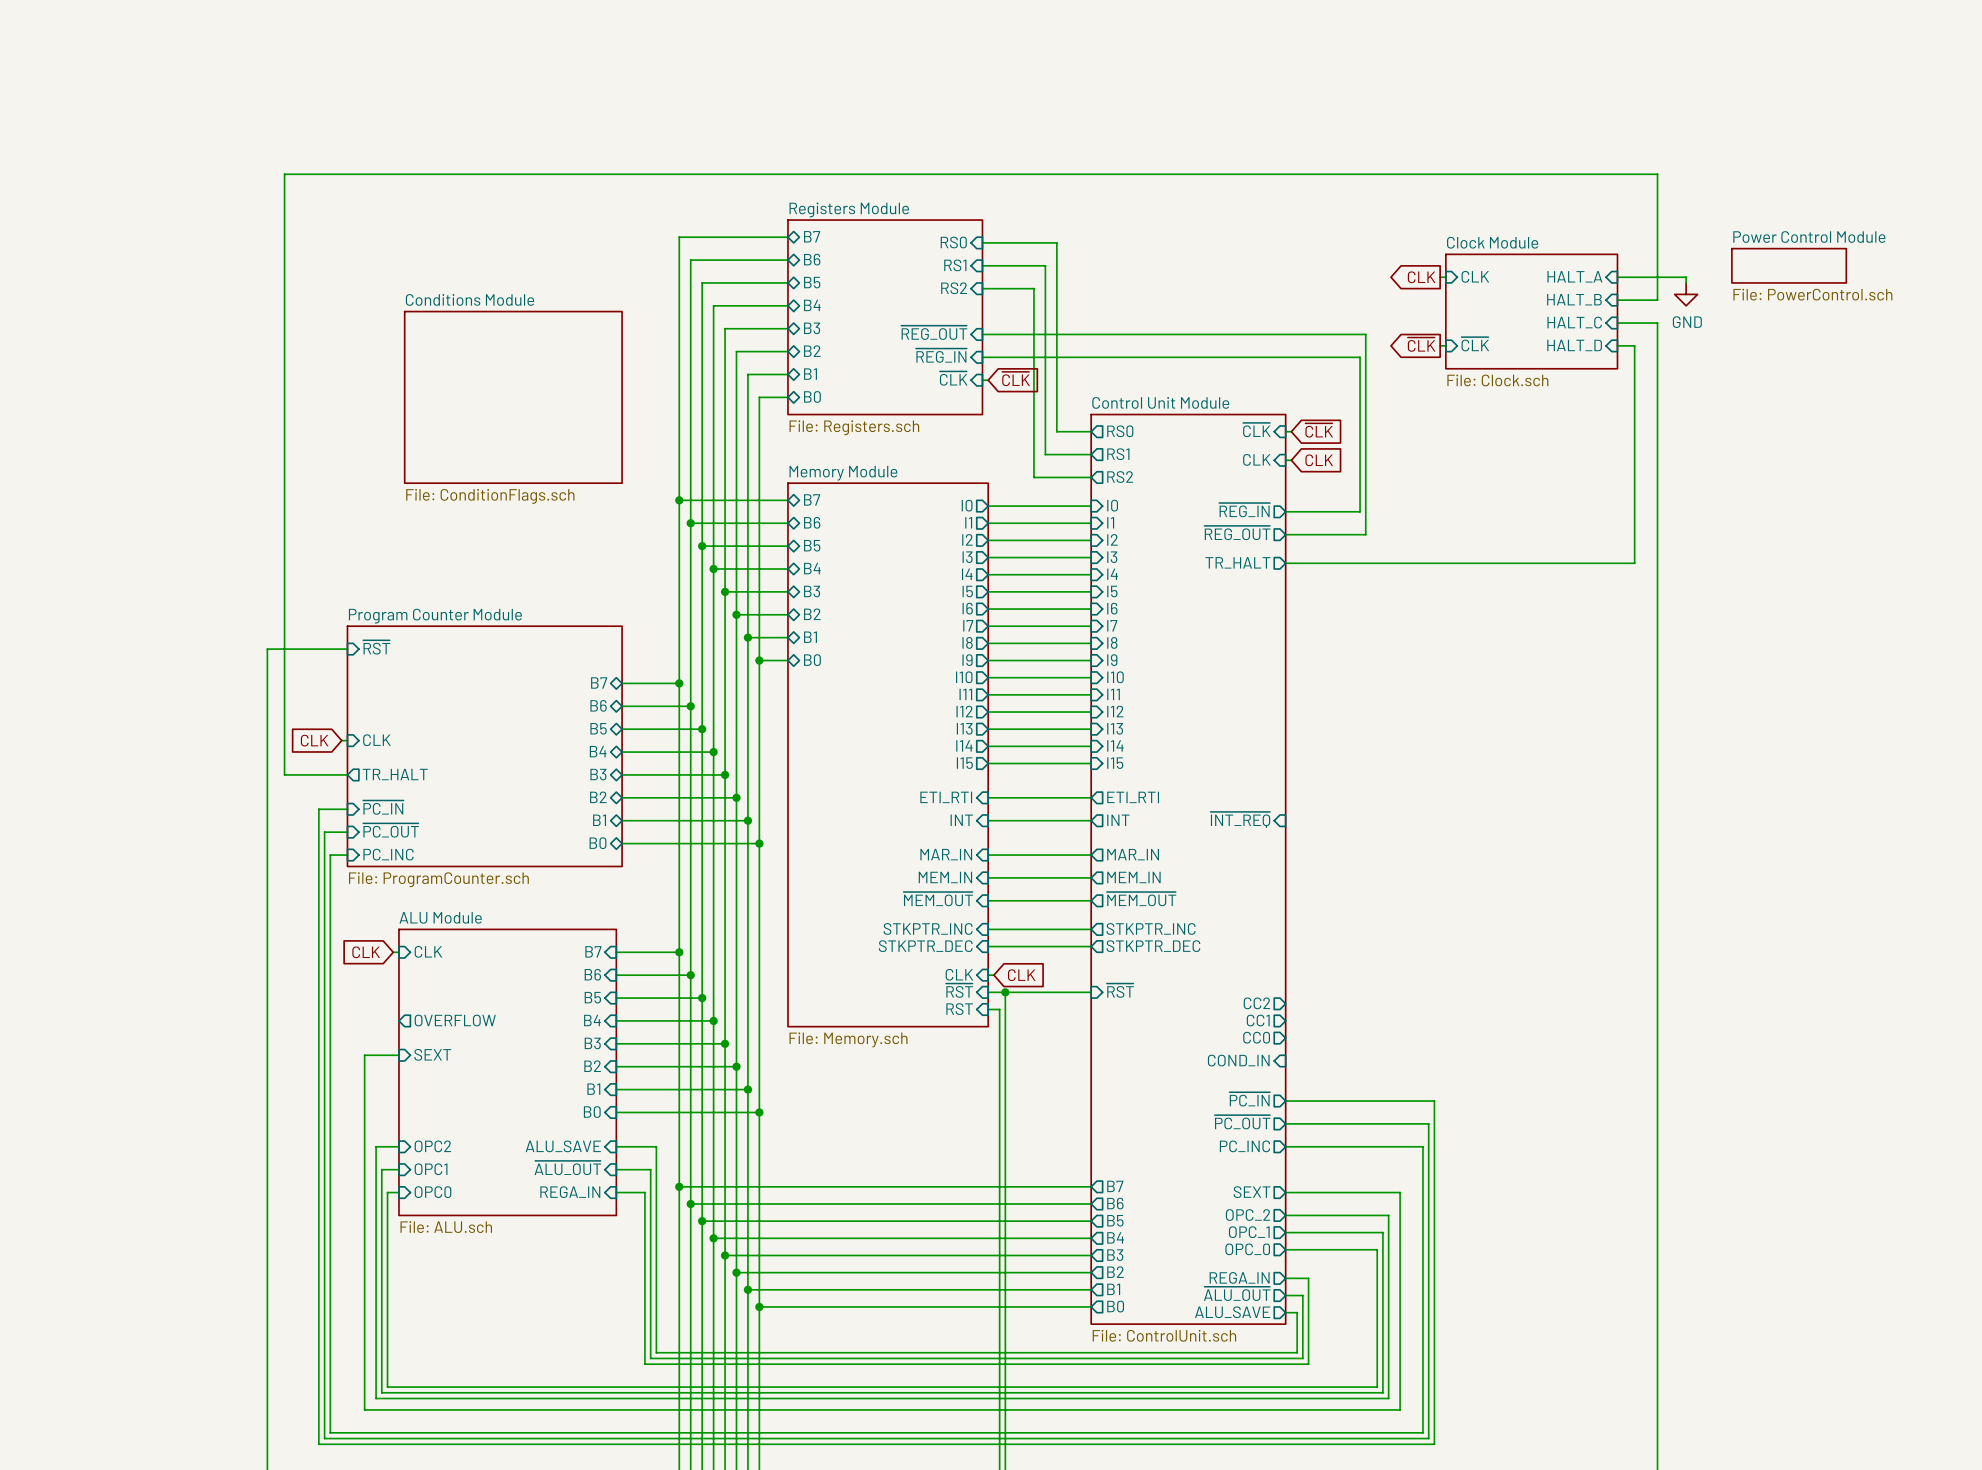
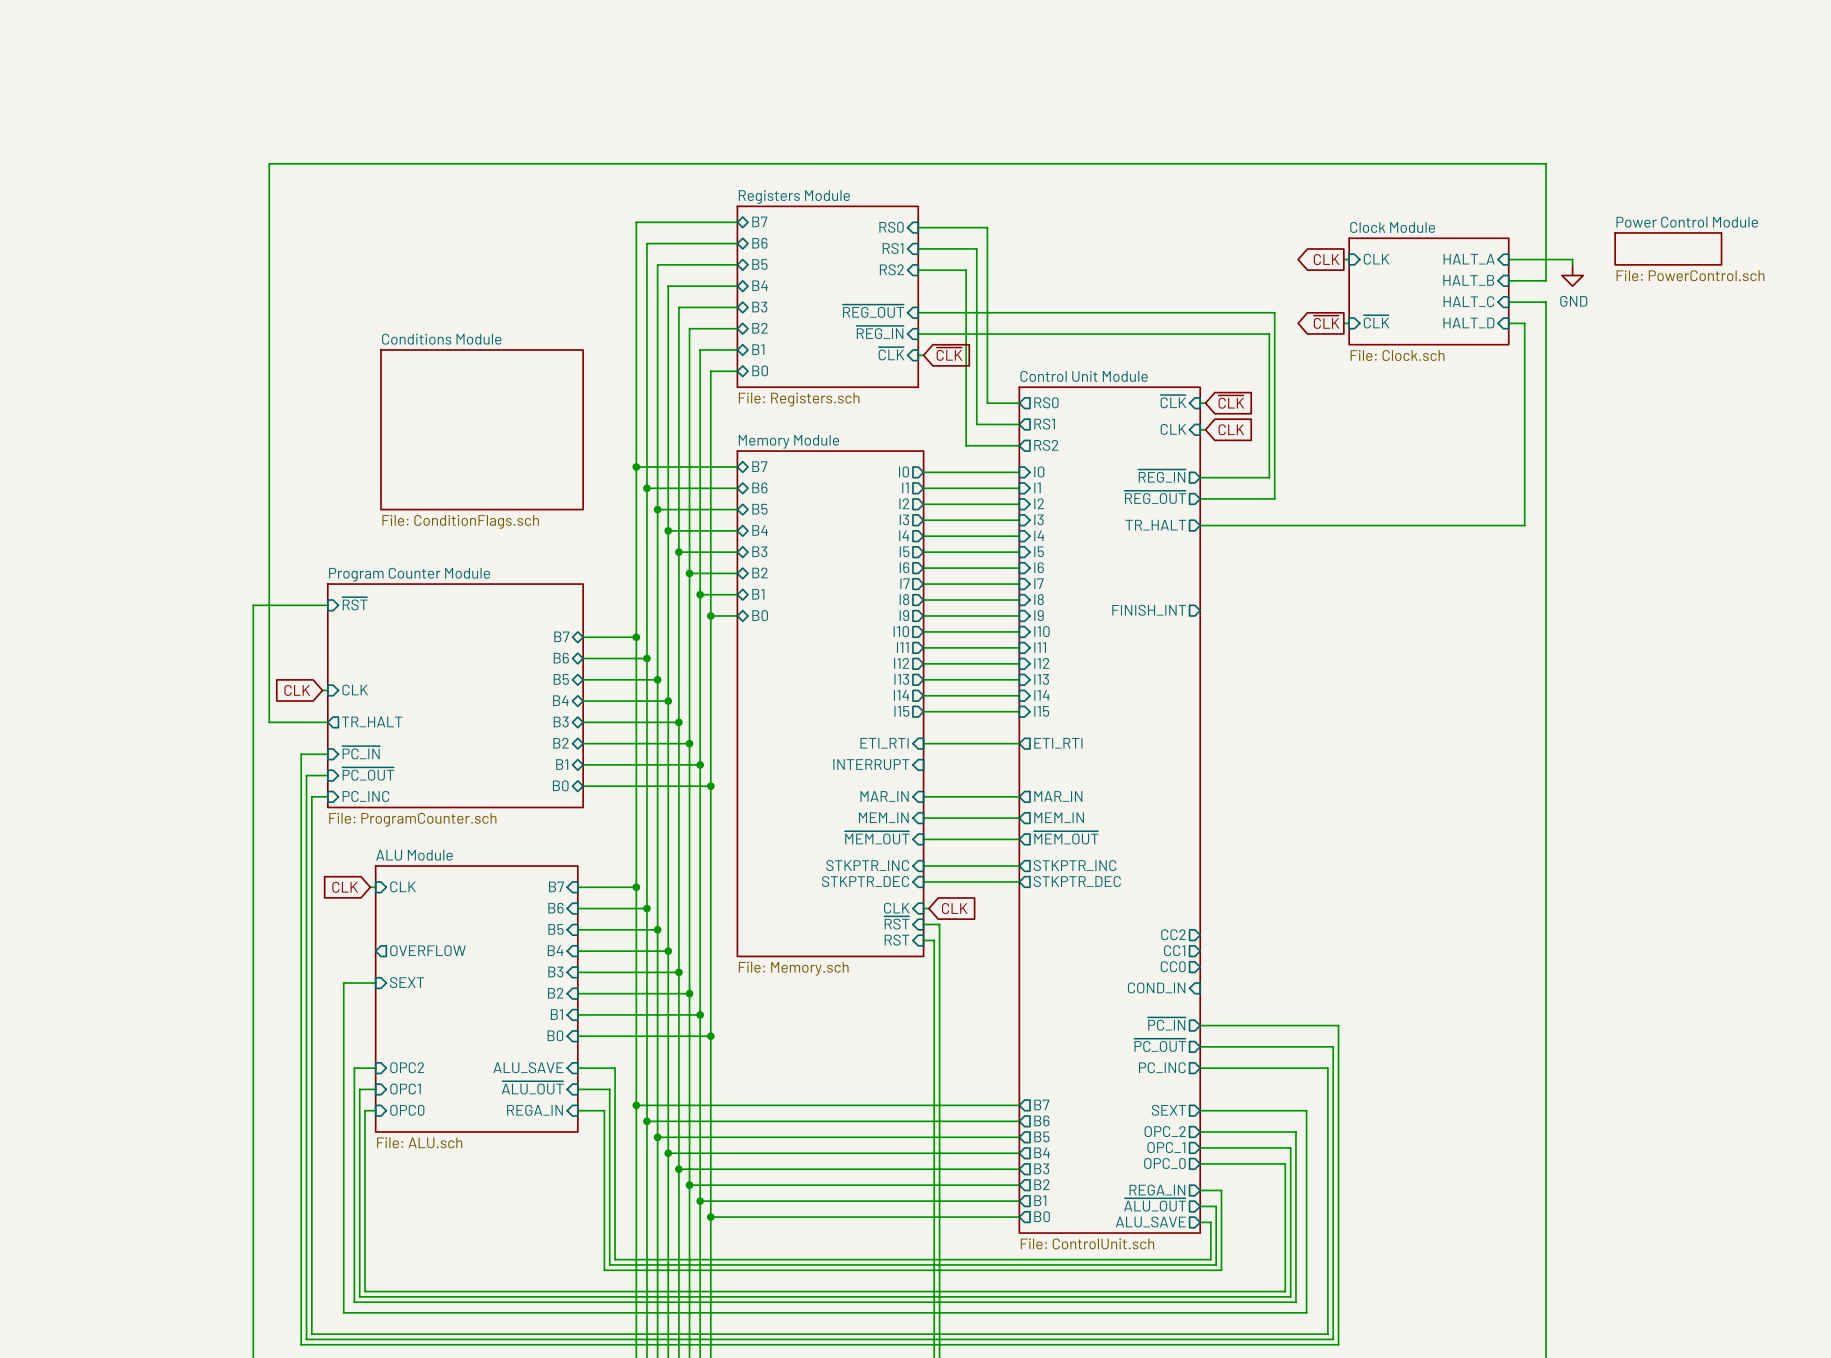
sheet Conditions Module position: (513, 397) -> (482, 429)
sheet pin: none -> FINISH_INT (1149, 610)
sheet pin: ~{INT_REQ} (1240, 819) -> none
sheet pin: INT (961, 820) -> INTERRUPT (871, 764)
wire: (988, 820) (1091, 820) -> none
sheet pin: INT (1118, 820) -> none
sheet pin: ~{RST} (1120, 990) -> none
wire: (1005, 992) (1091, 992) -> none
junction: (1005, 992) -> none

